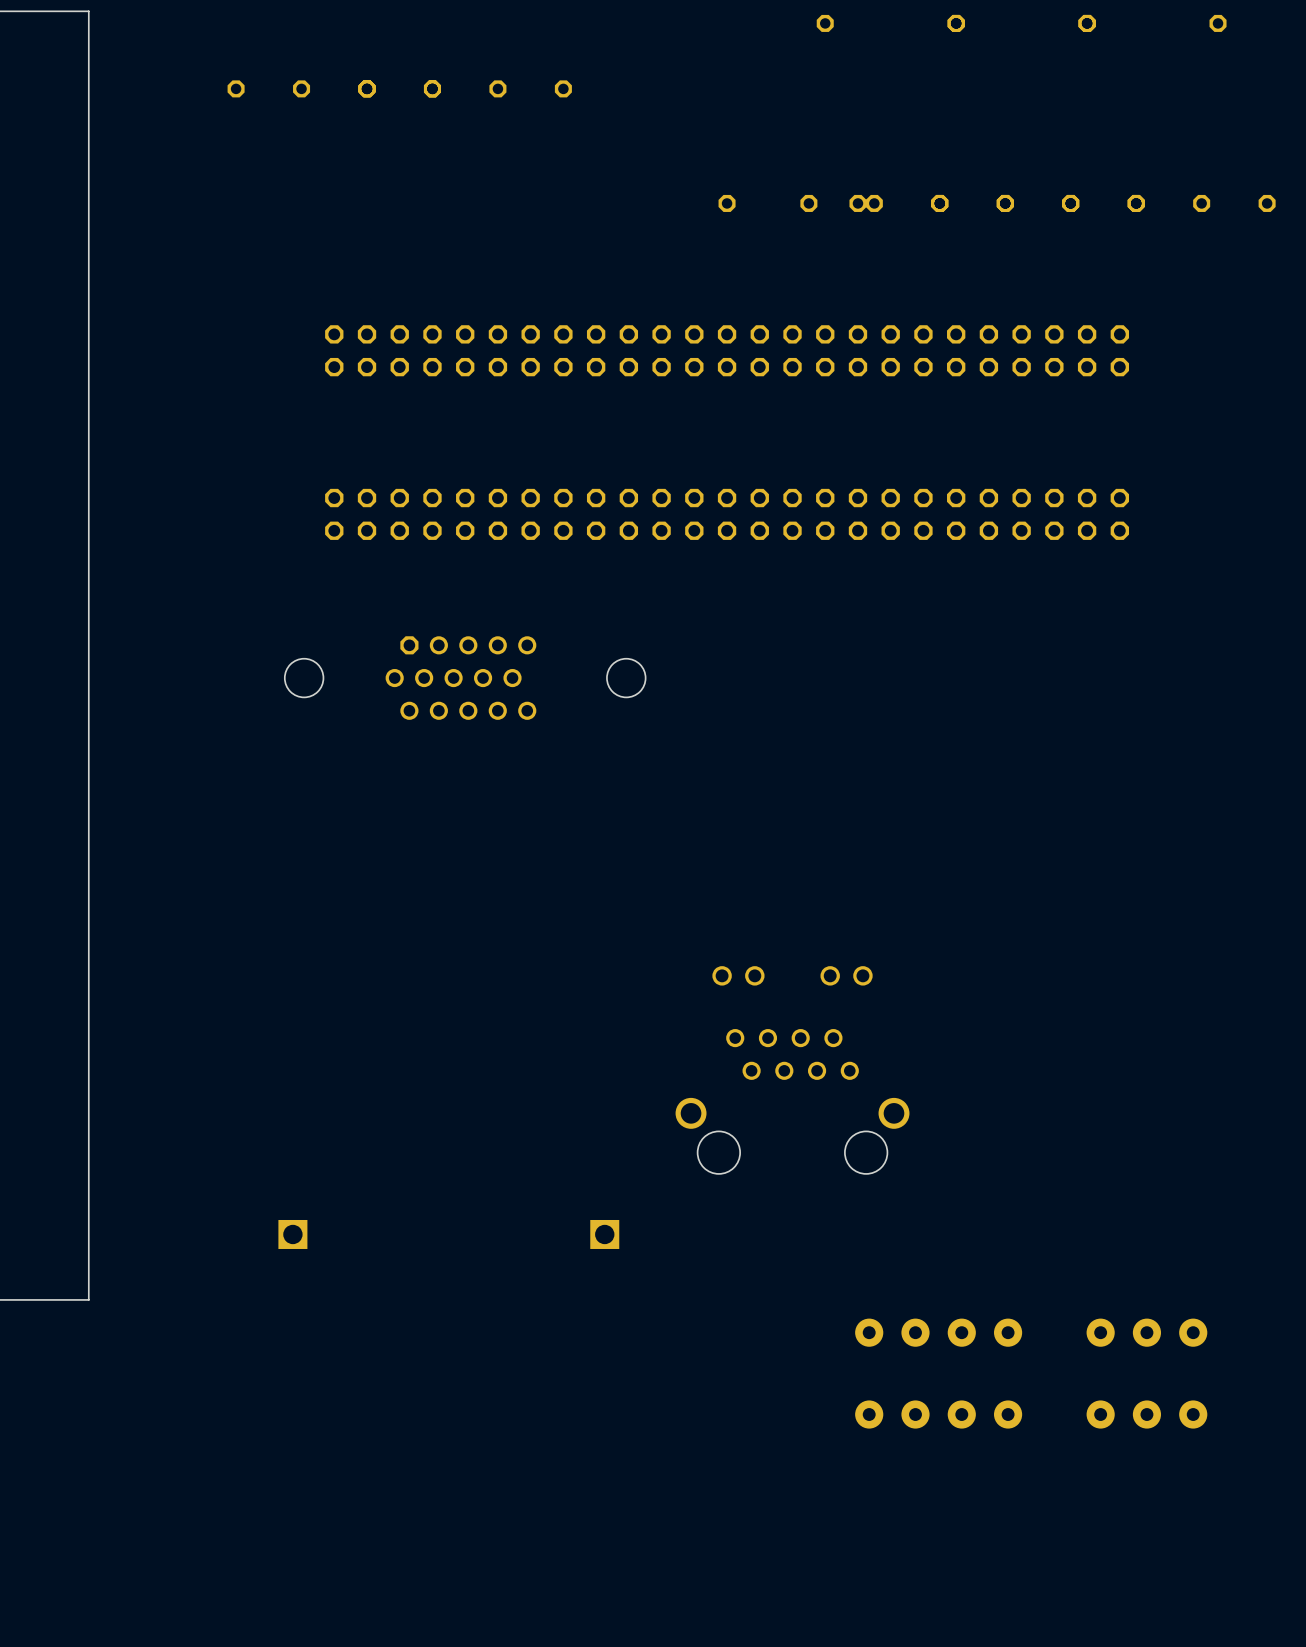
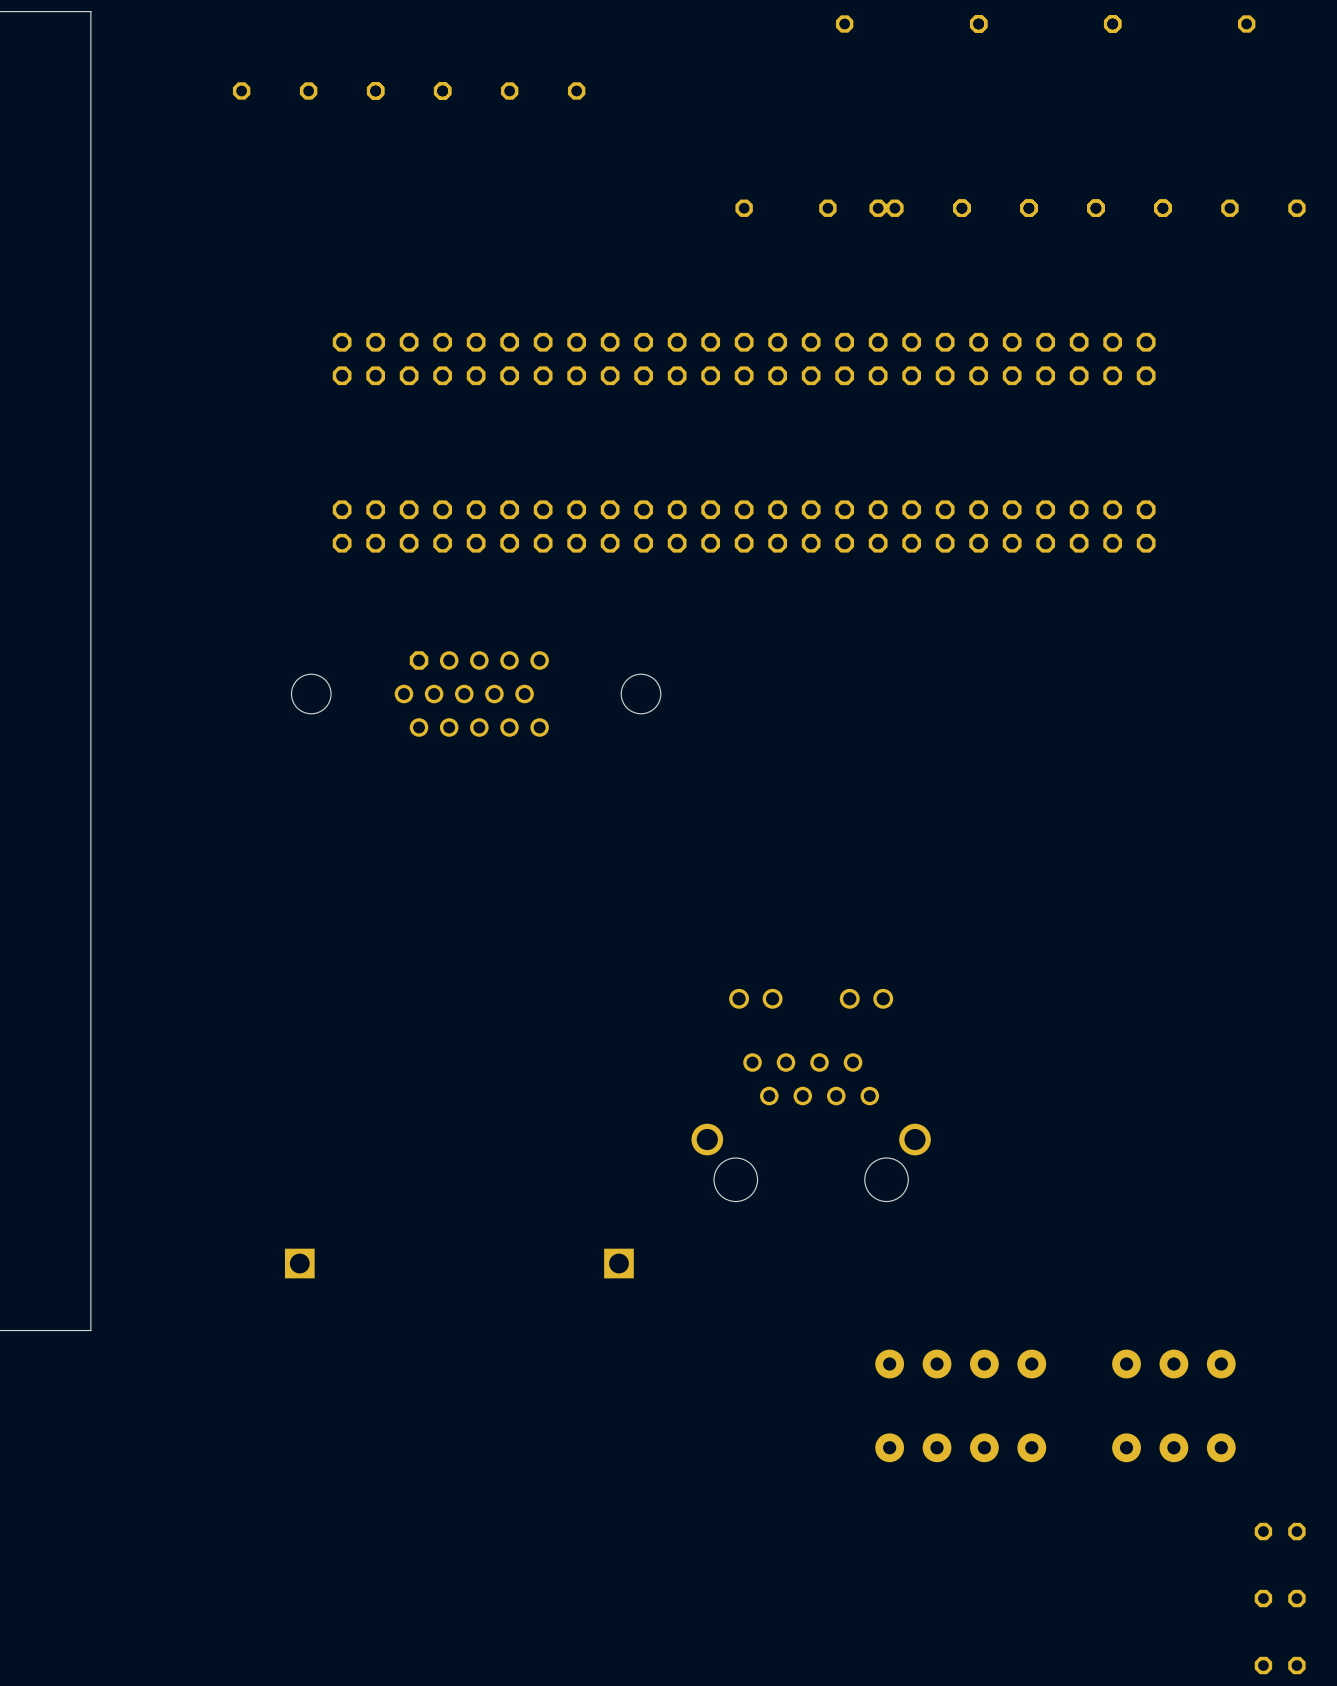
part: none -> (1280, 1531)
part: none -> (1280, 1598)
part: none -> (1280, 1665)

